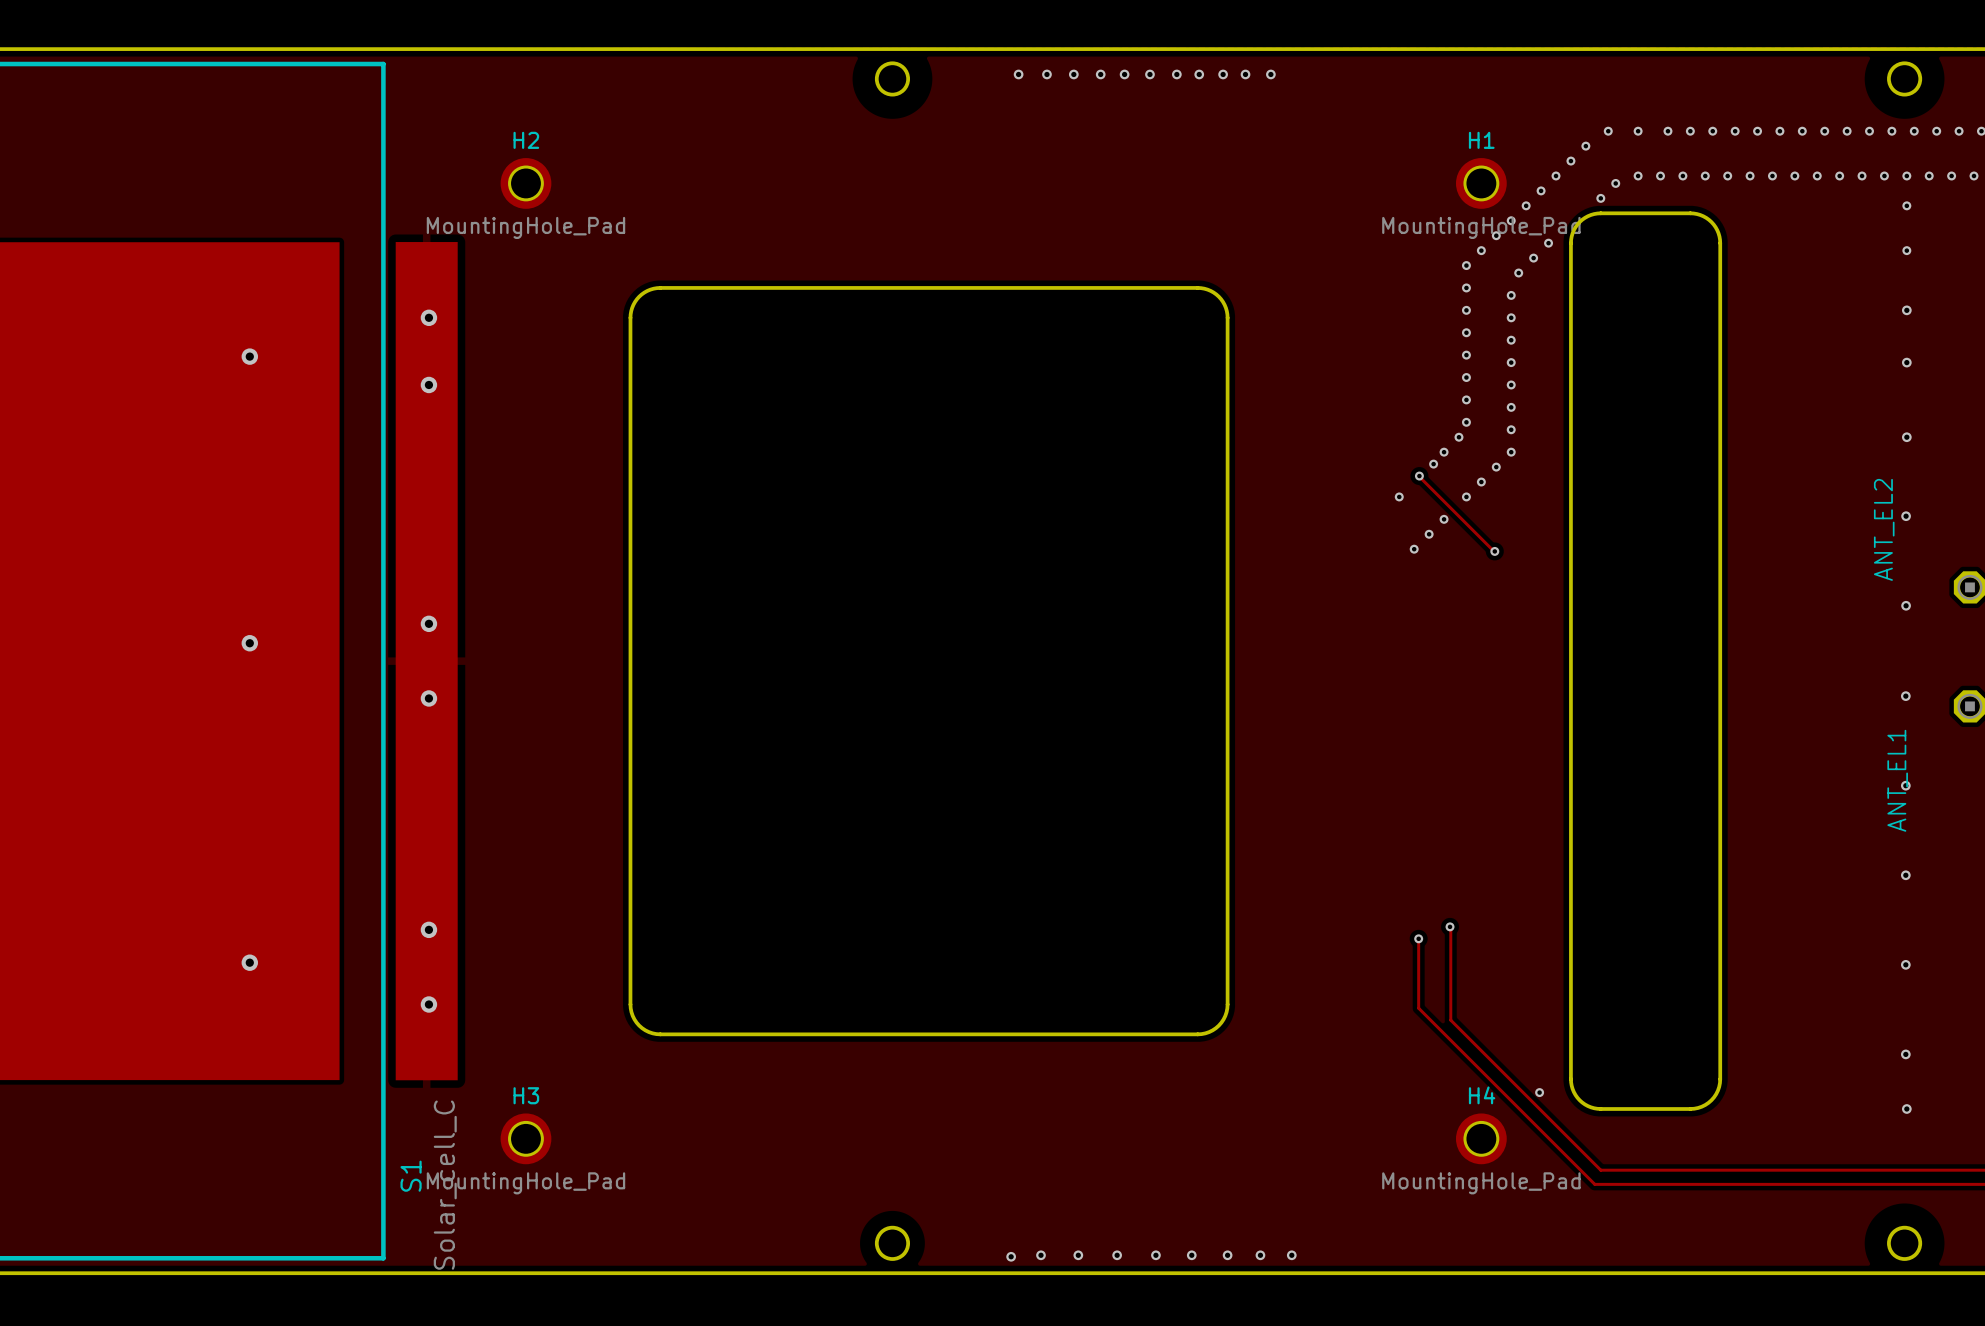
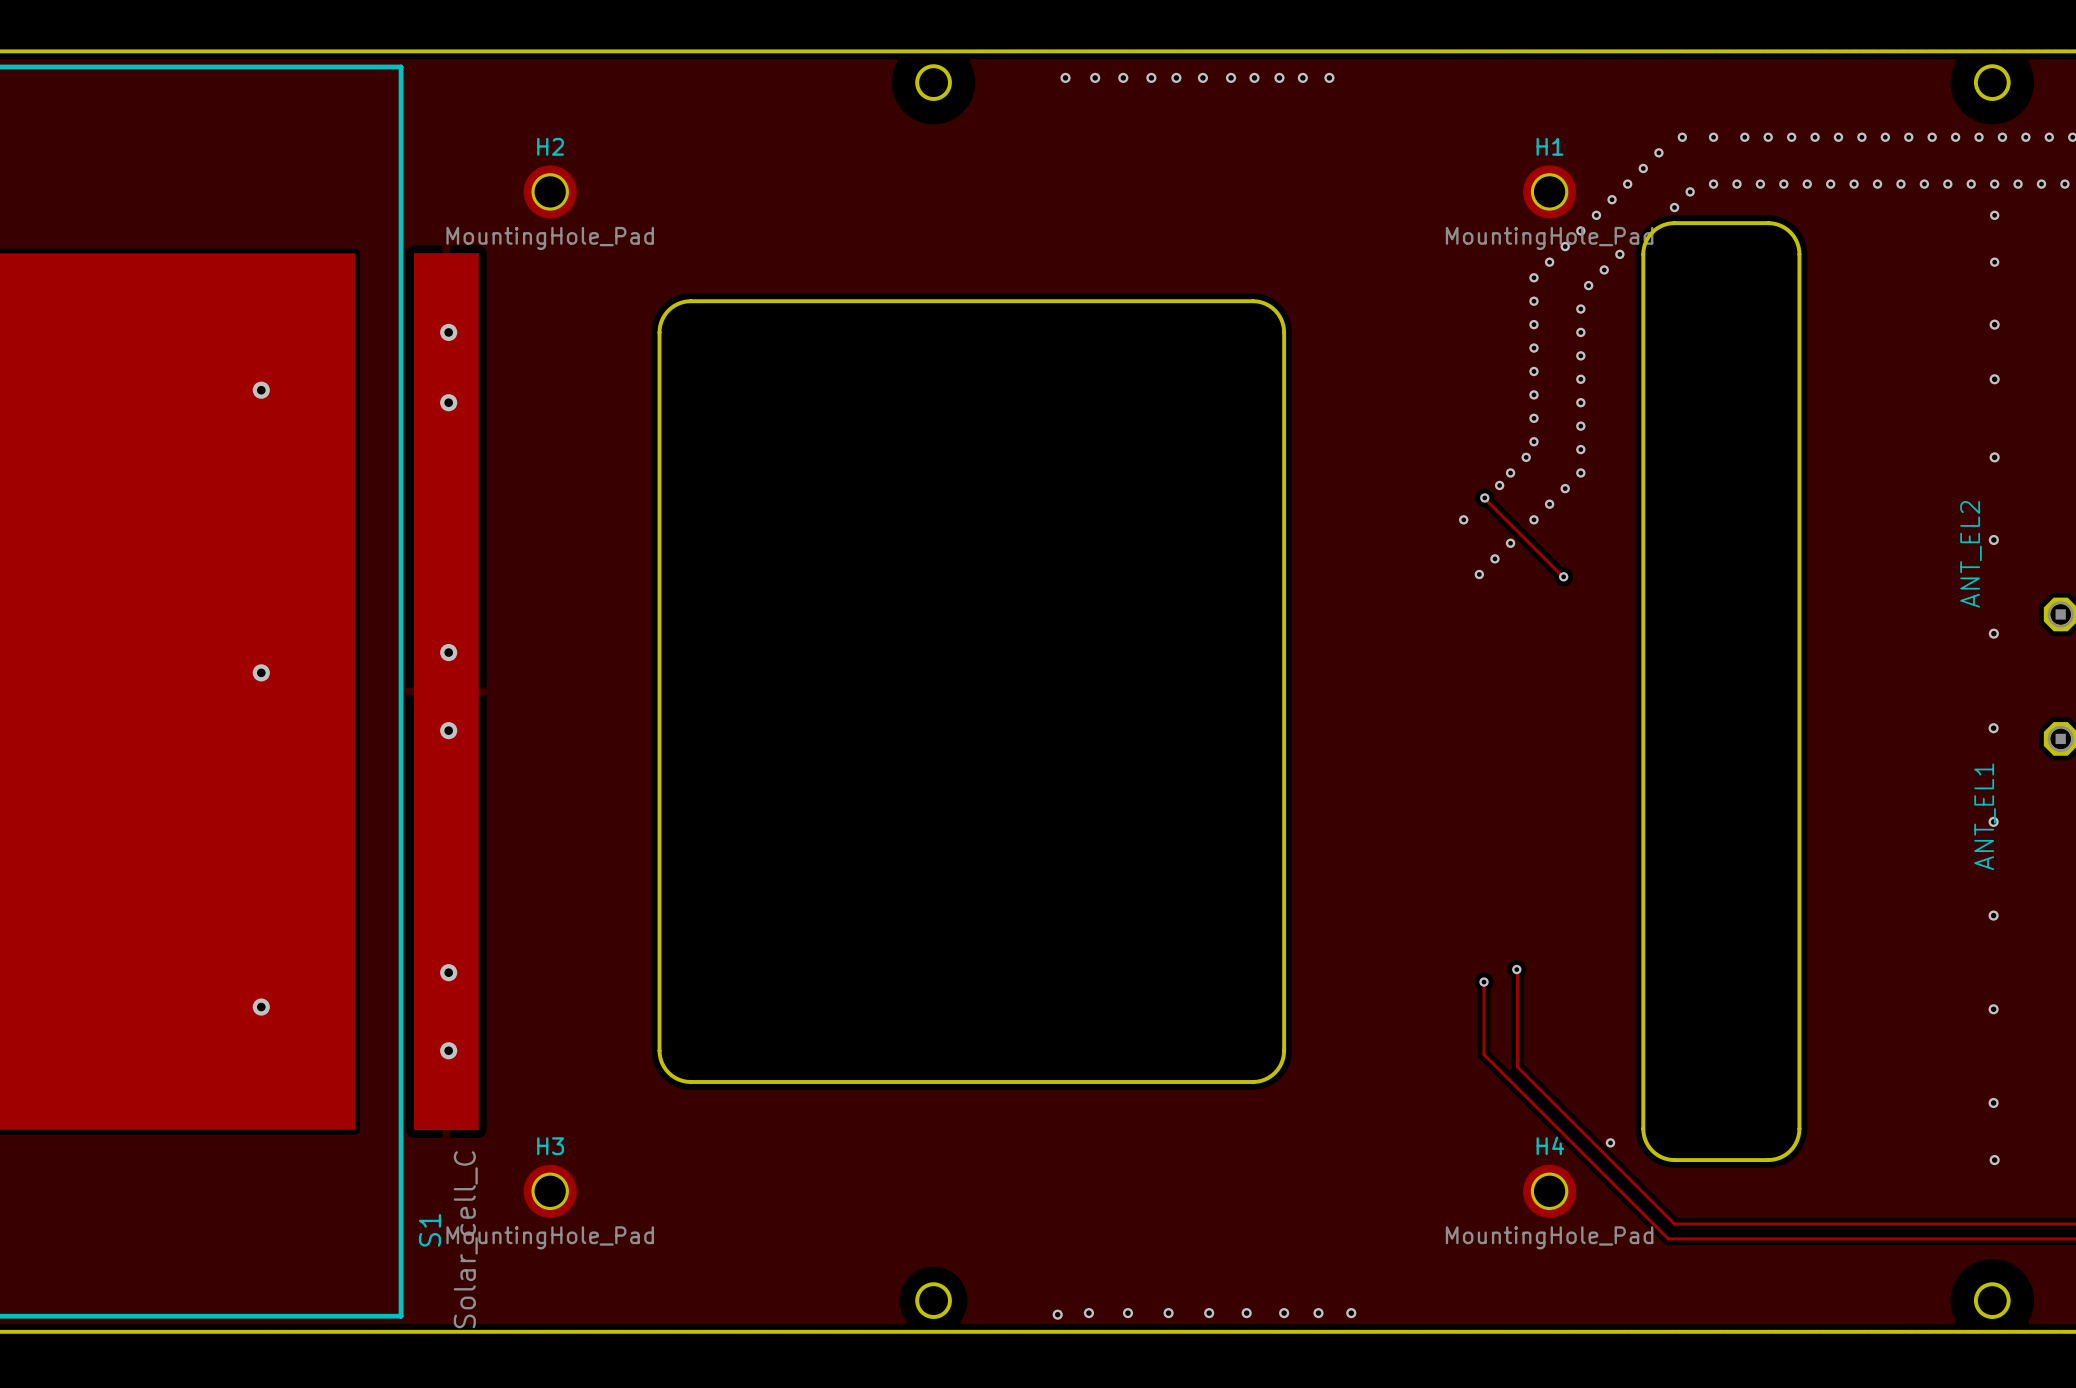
via position: (249, 356) -> (261, 390)

